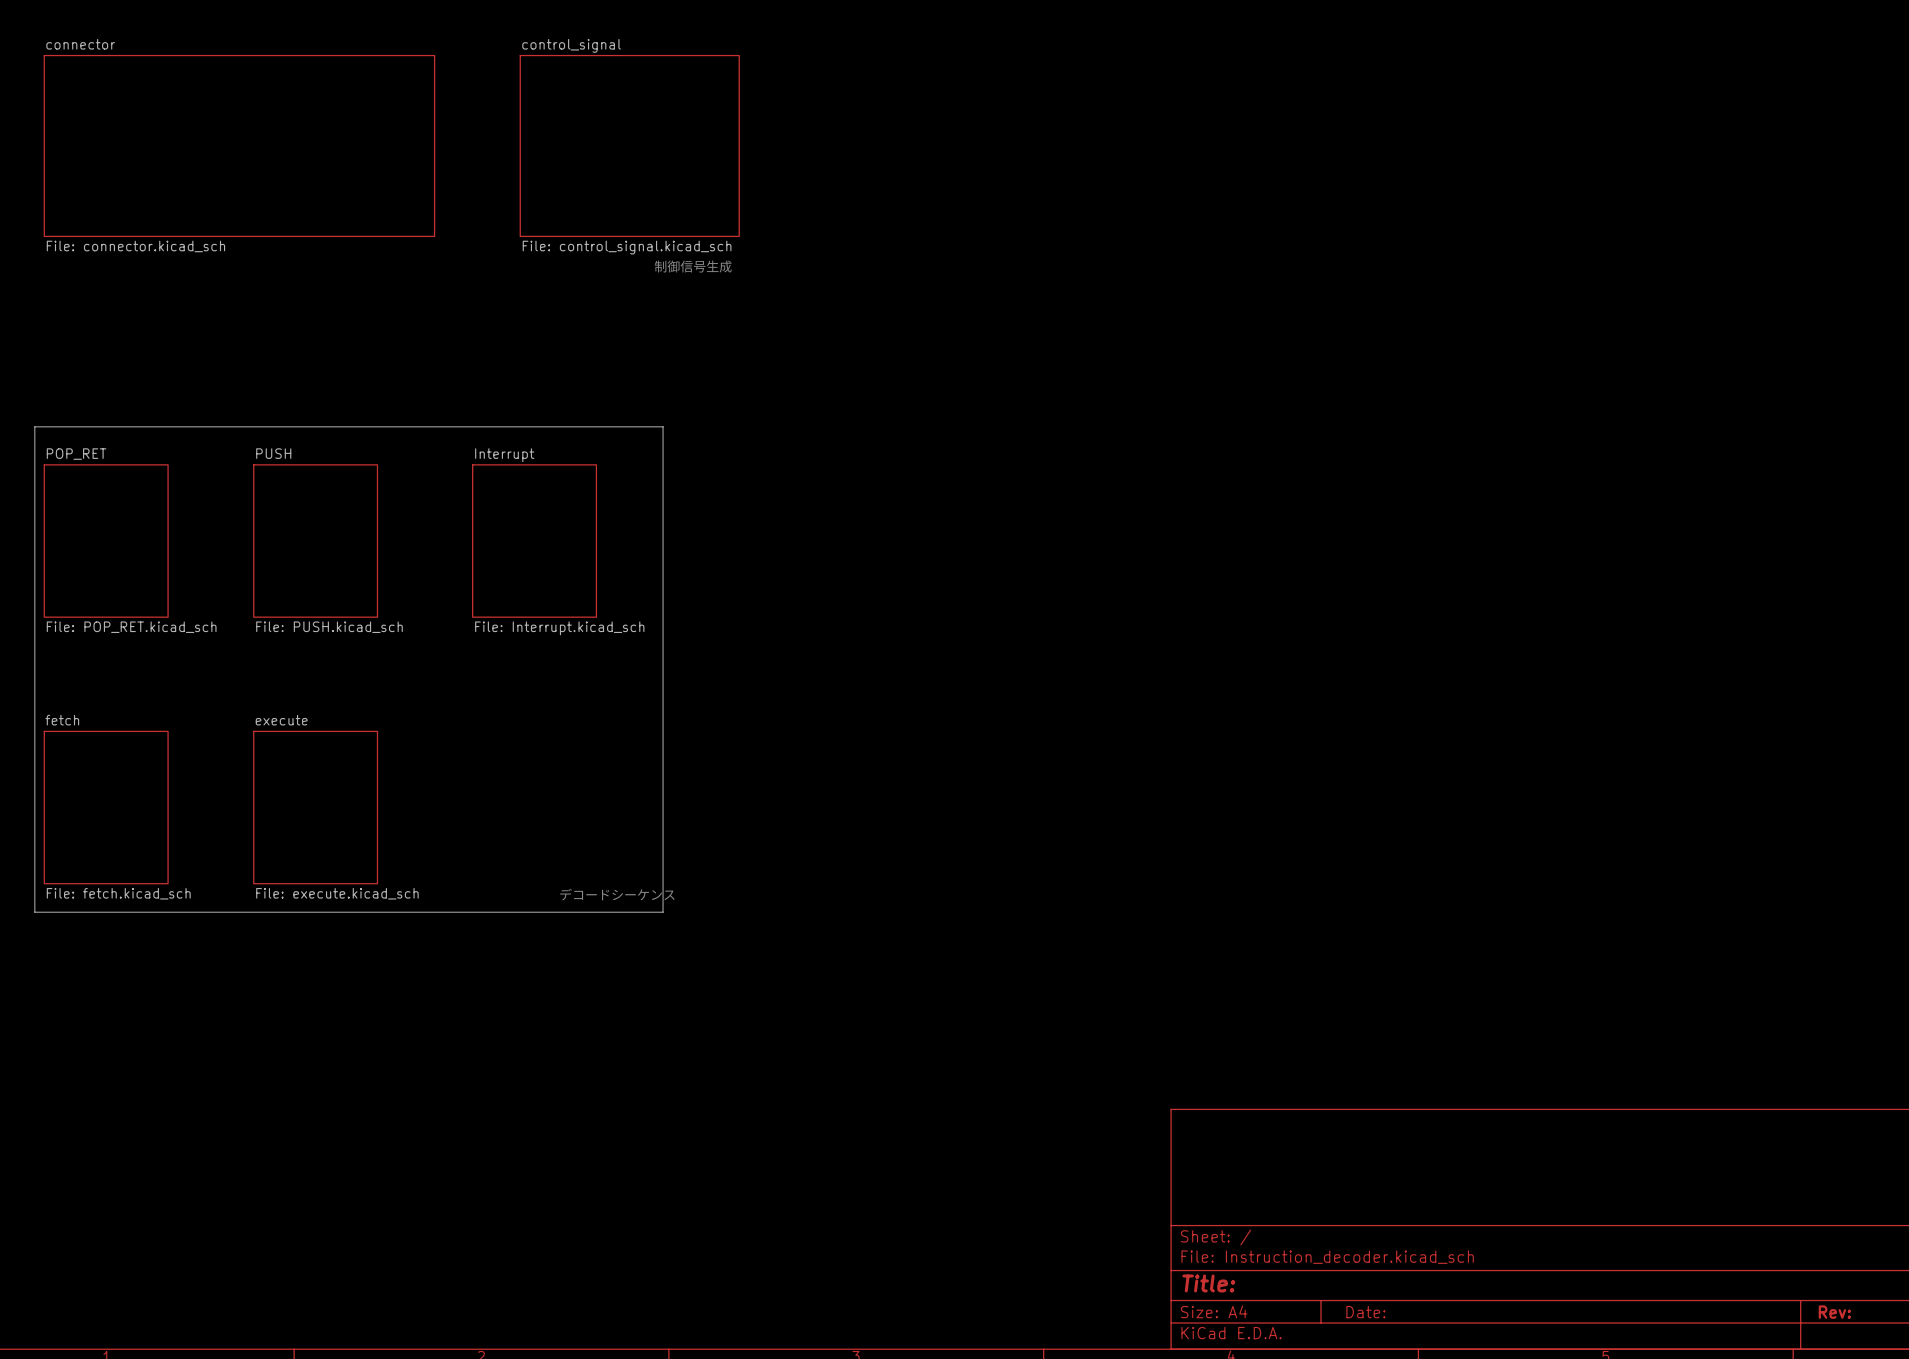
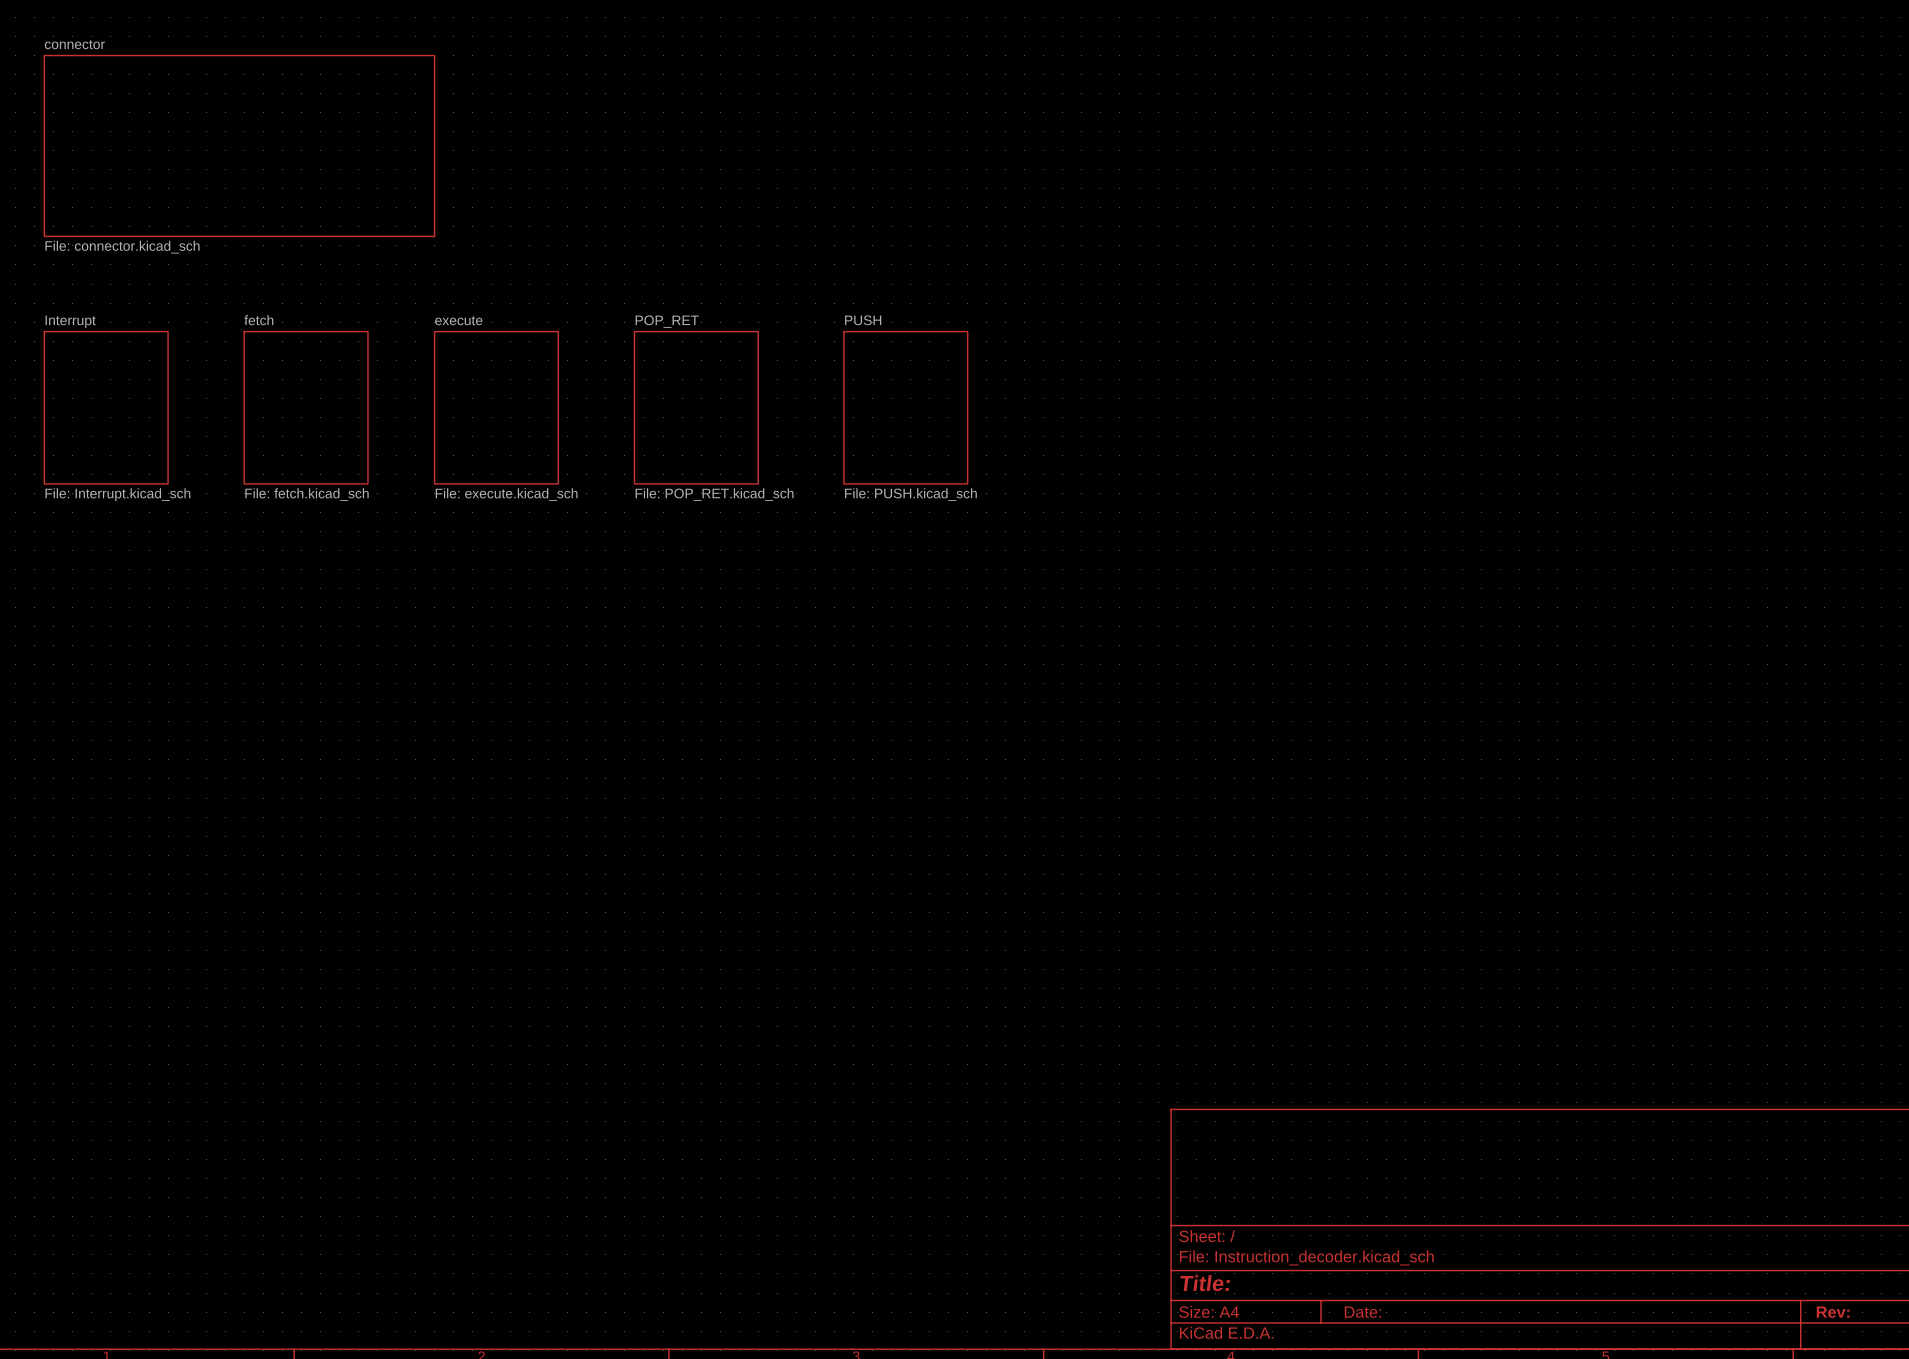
sheet control_signal: File: control_signal.kicad_sch (629, 145) -> none
text: 制御信号生成 (693, 266) -> none
sheet Interrupt: none -> File: Interrupt.kicad_sch (106, 407)
sheet fetch: none -> File: fetch.kicad_sch (306, 407)
sheet execute: none -> File: execute.kicad_sch (496, 407)
sheet POP_RET: none -> File: POP_RET.kicad_sch (696, 407)
sheet PUSH: none -> File: PUSH.kicad_sch (905, 407)
line: (34, 426) (34, 912) (663, 912) (663, 426) (34, 426) -> none
sheet POP_RET: File: POP_RET.kicad_sch (106, 541) -> none
sheet PUSH: File: PUSH.kicad_sch (315, 541) -> none
sheet Interrupt: File: Interrupt.kicad_sch (534, 541) -> none
sheet fetch: File: fetch.kicad_sch (106, 807) -> none
sheet execute: File: execute.kicad_sch (315, 807) -> none
text: デコードシーケンス (617, 894) -> none

